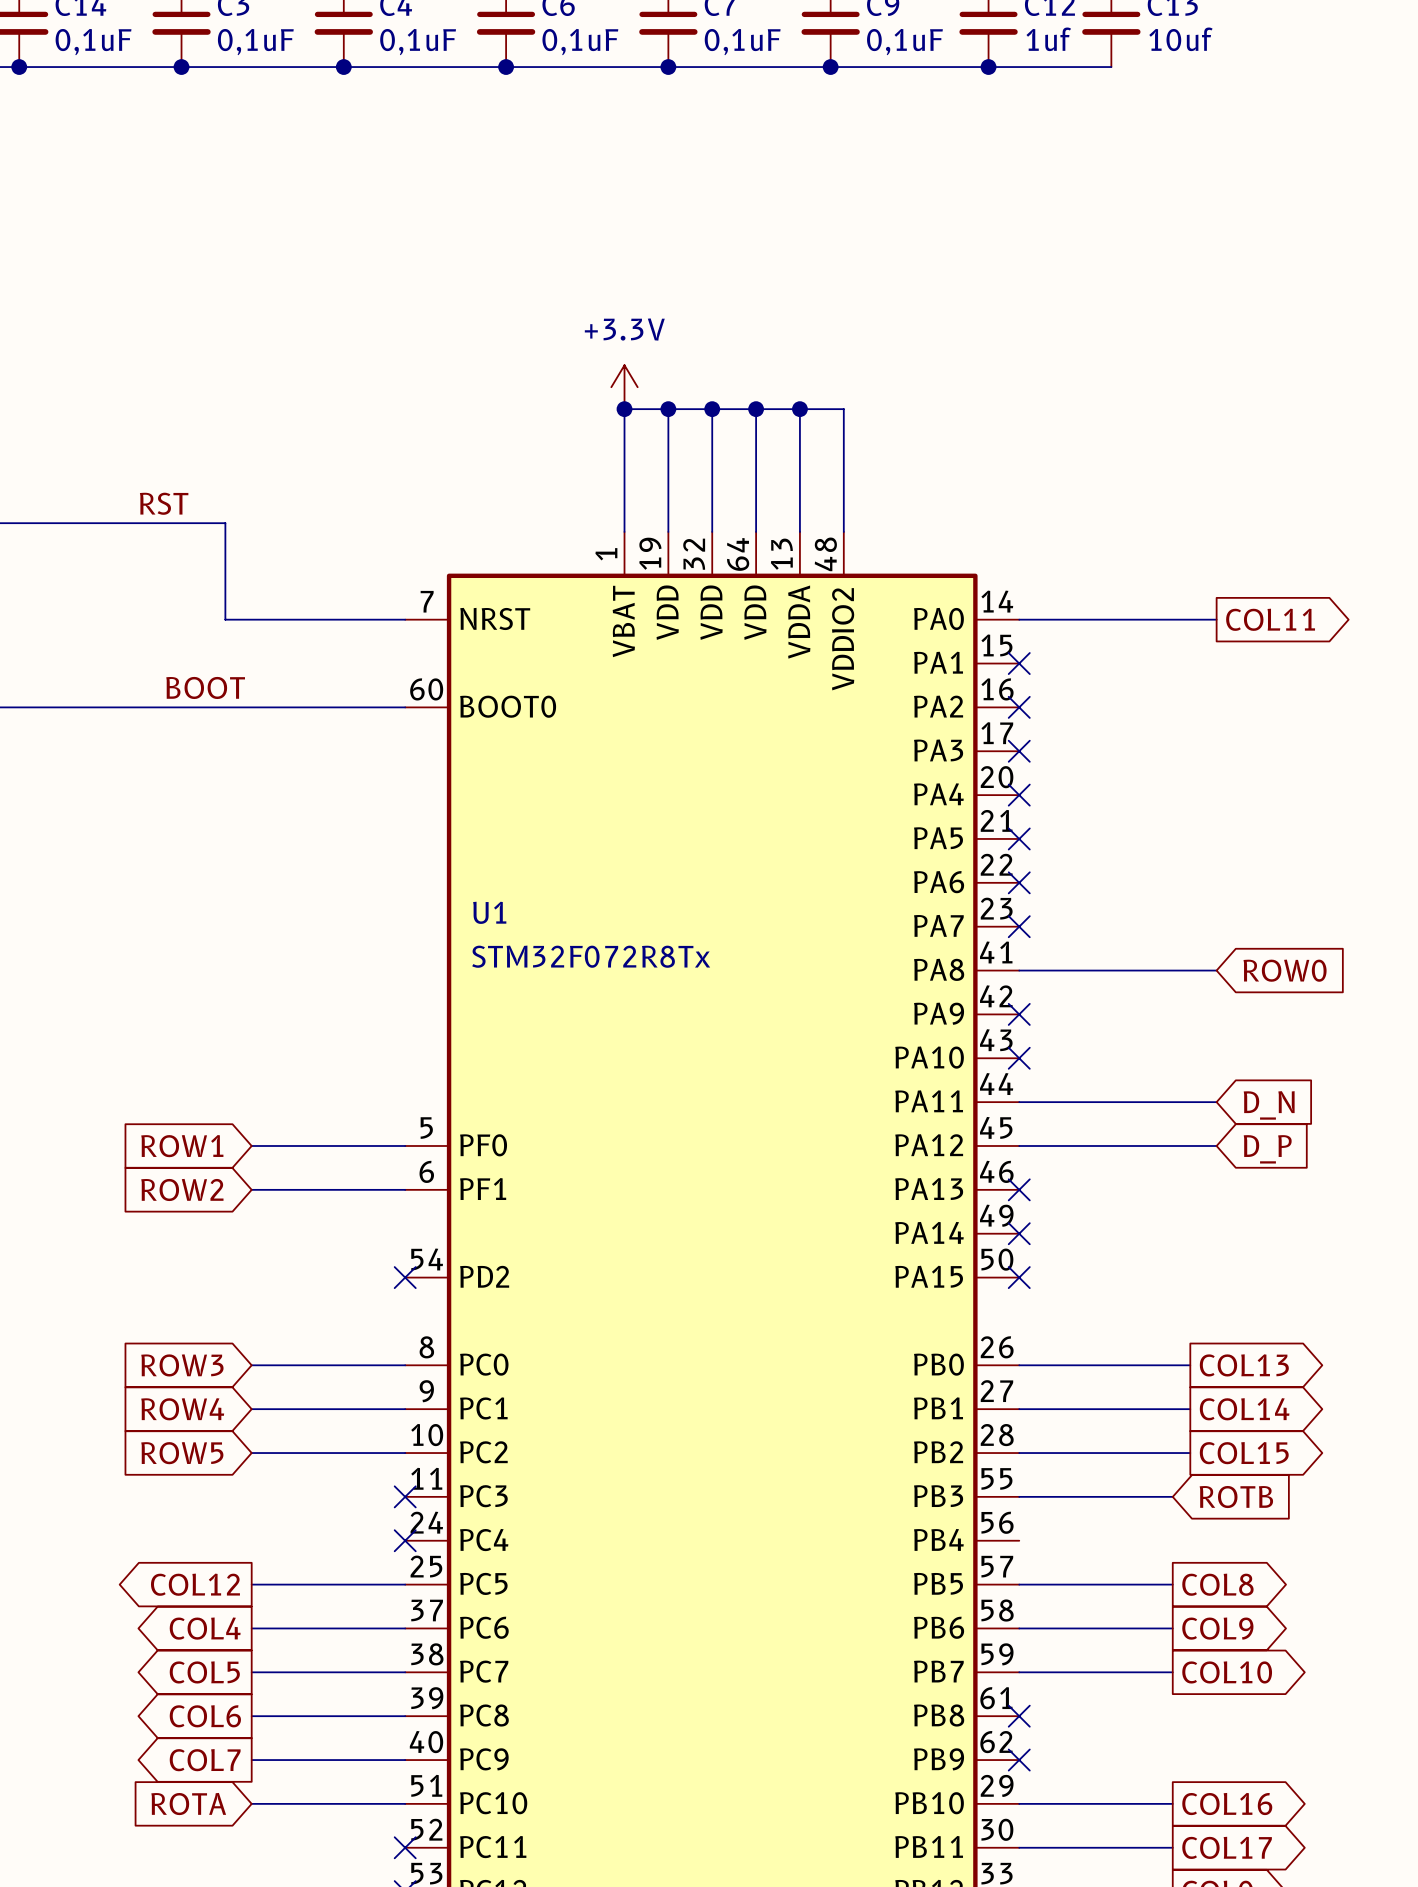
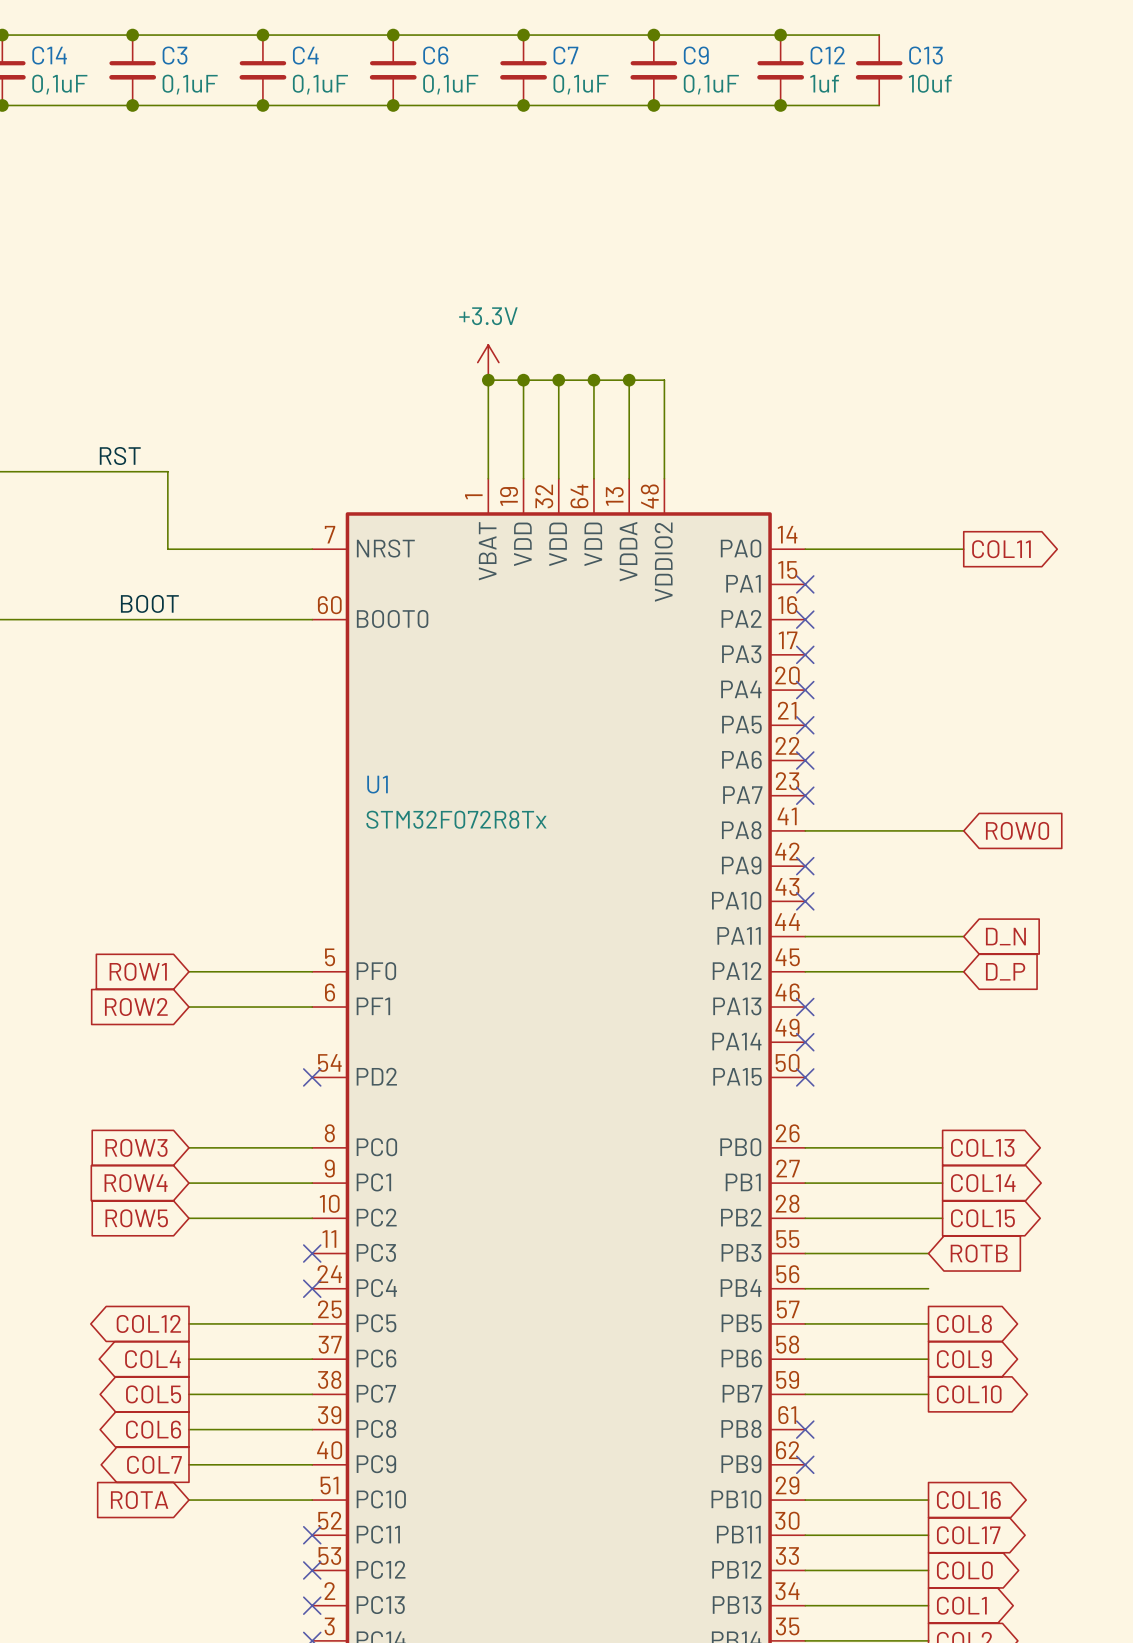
wire: none -> (805, 1288) (928, 1288)

